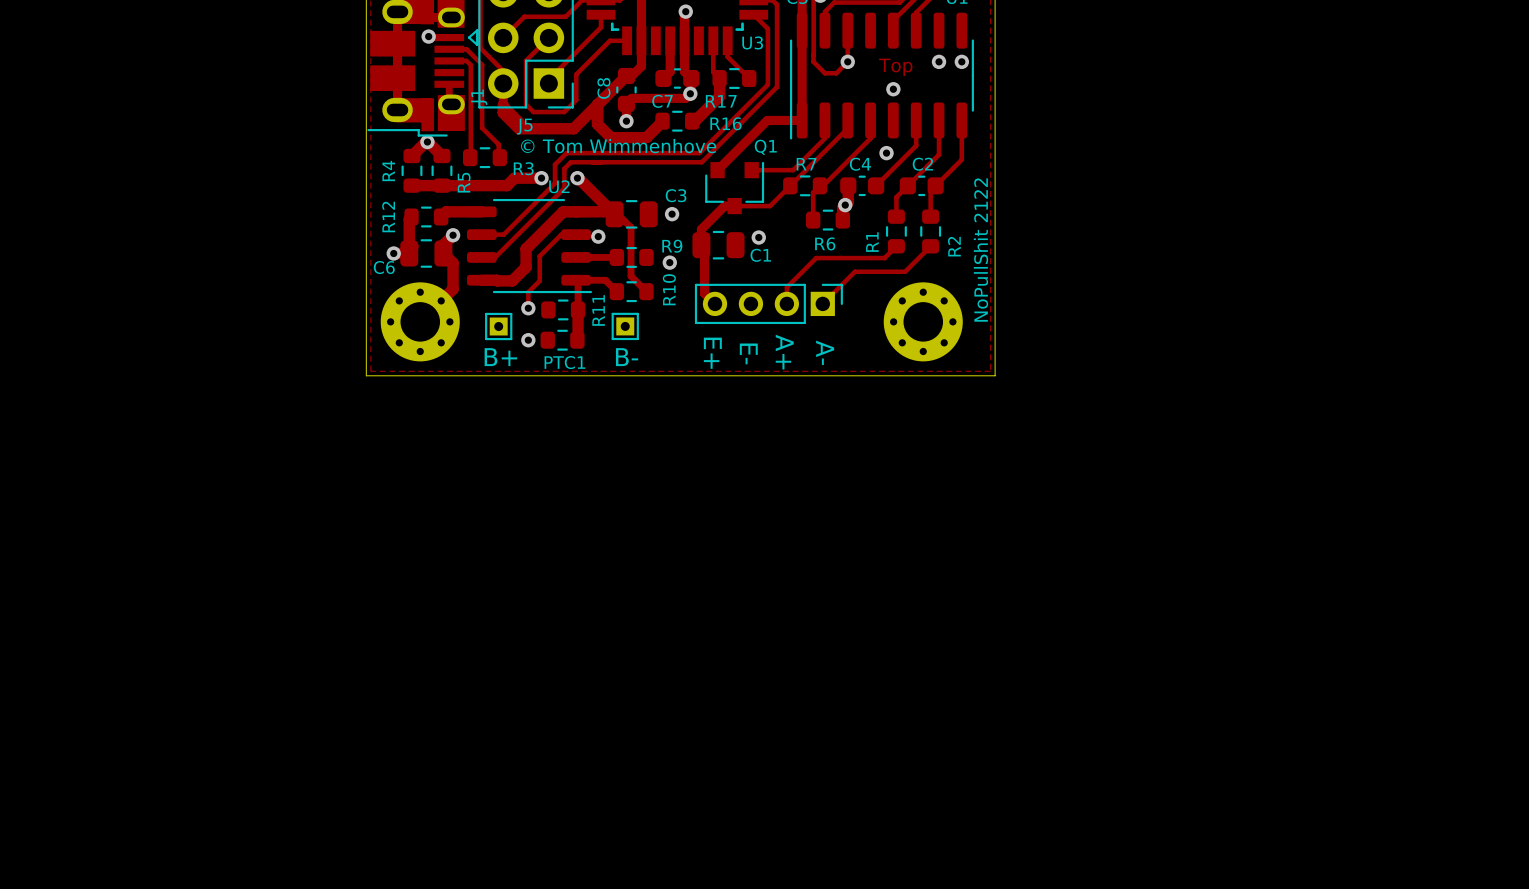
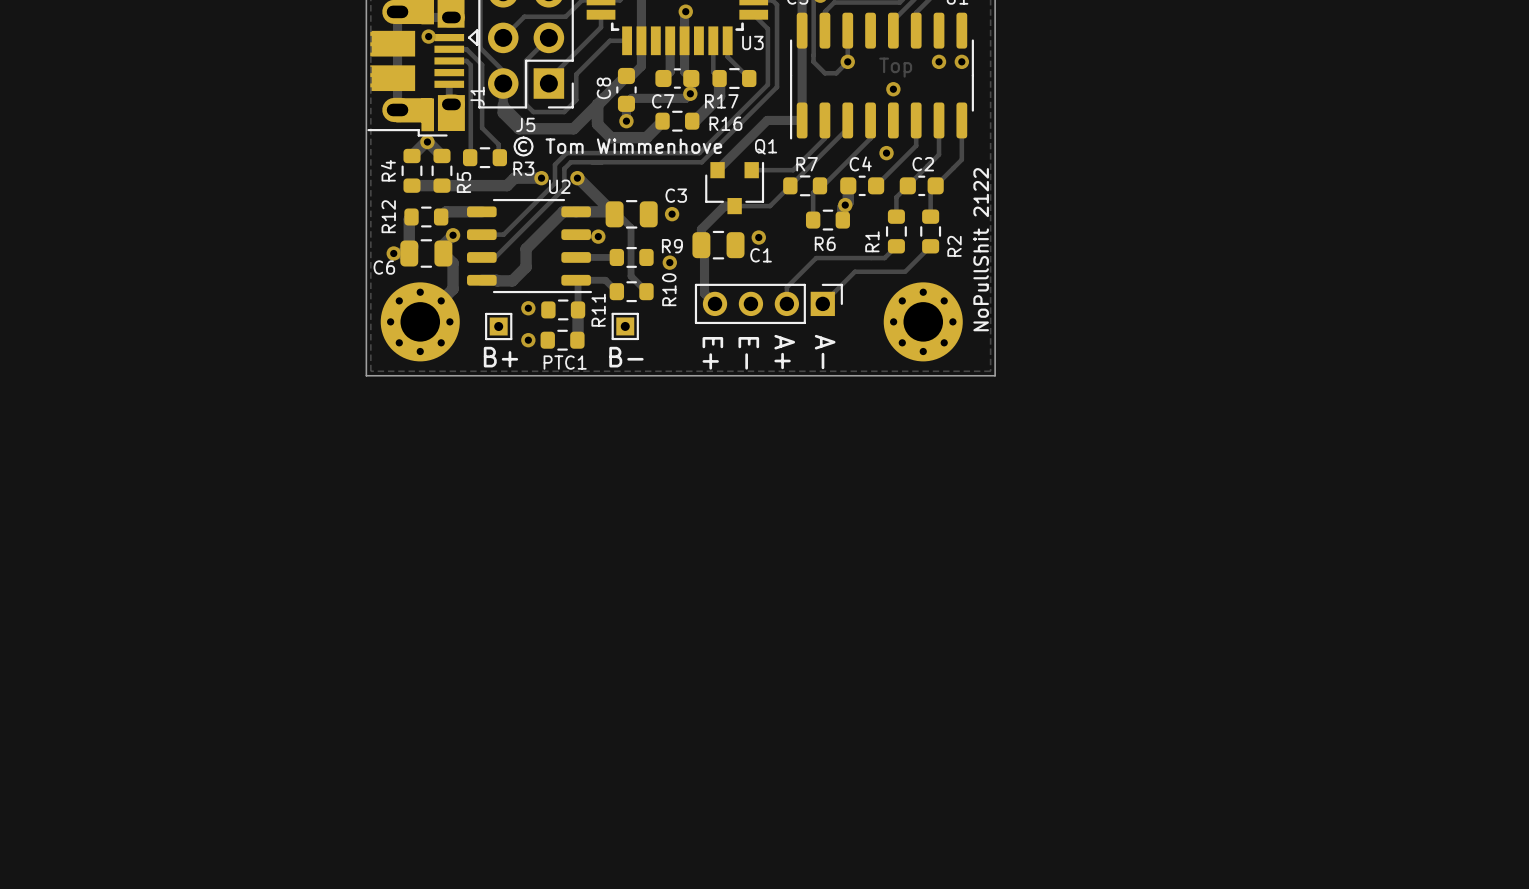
track: (576, 234) (561, 234) (539, 256) (539, 280) (528, 292) (528, 308) -> none

